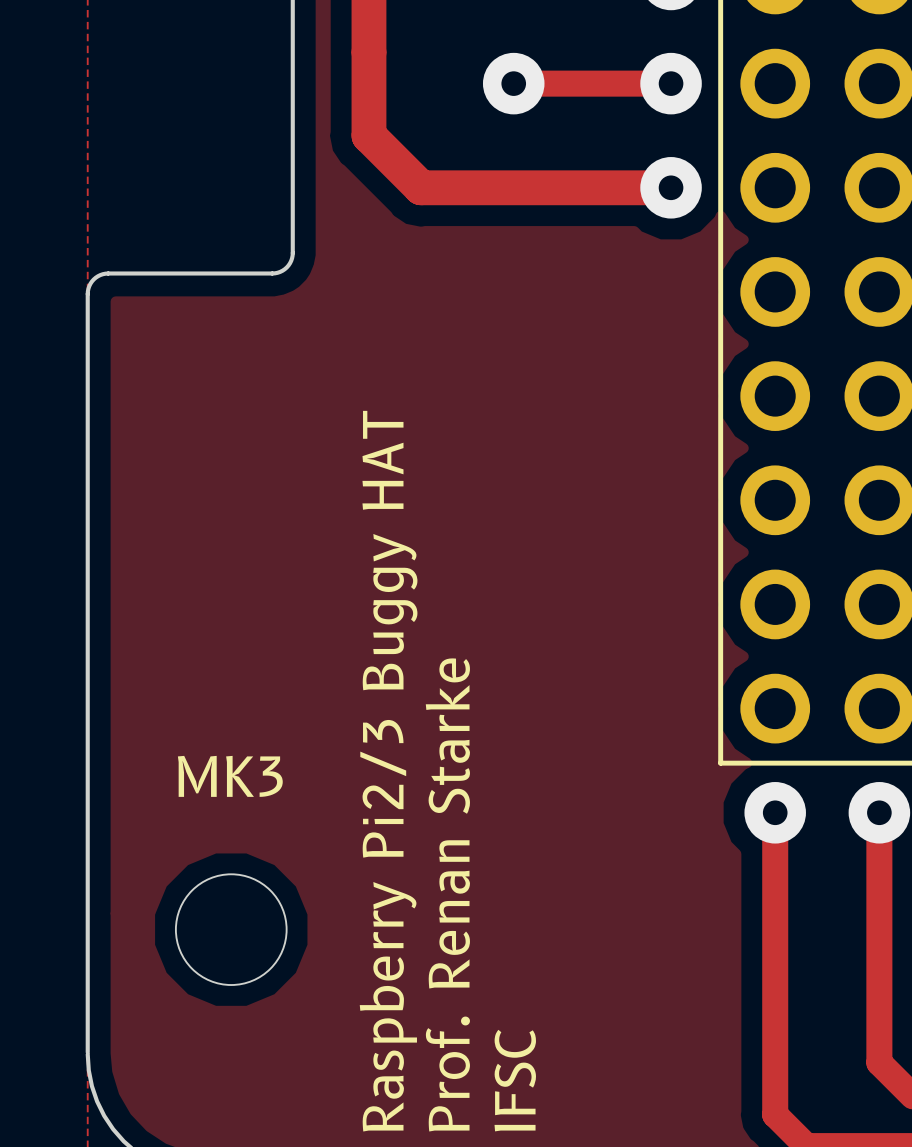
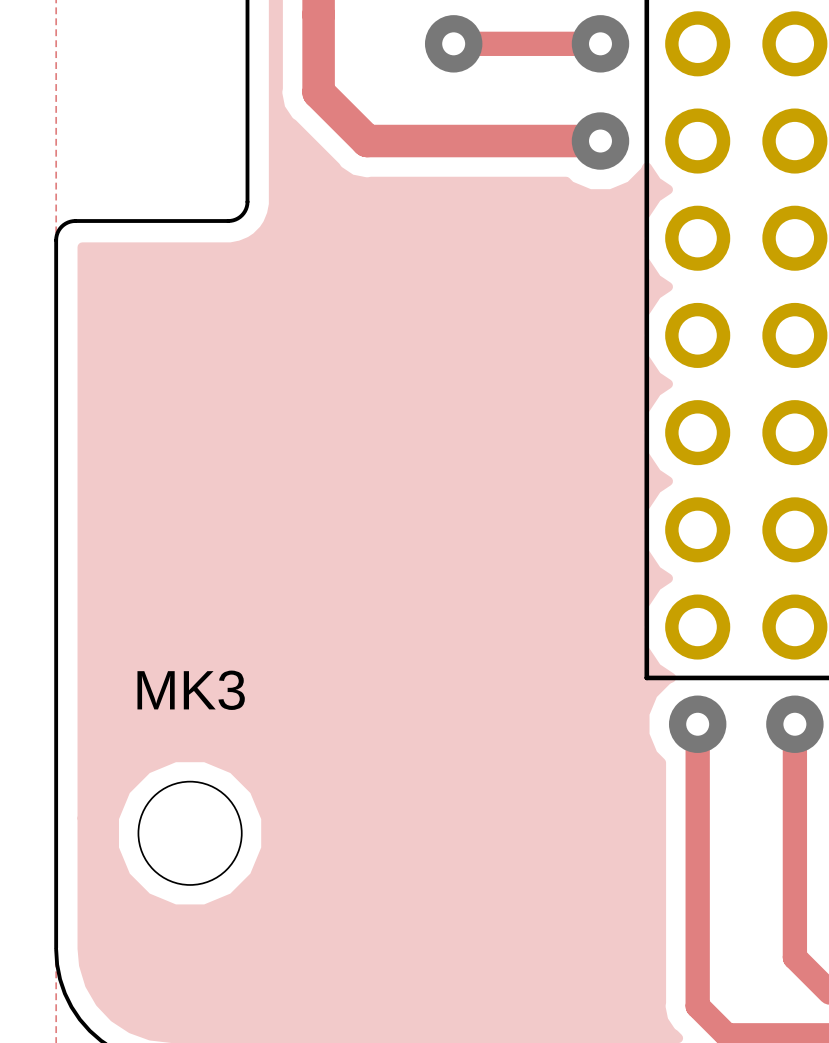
text: Raspberry Pi2/3 Buggy HAT (388, 771) -> none
text: Prof. Renan Starke (447, 894) -> none
text: IFSC (515, 1080) -> none

